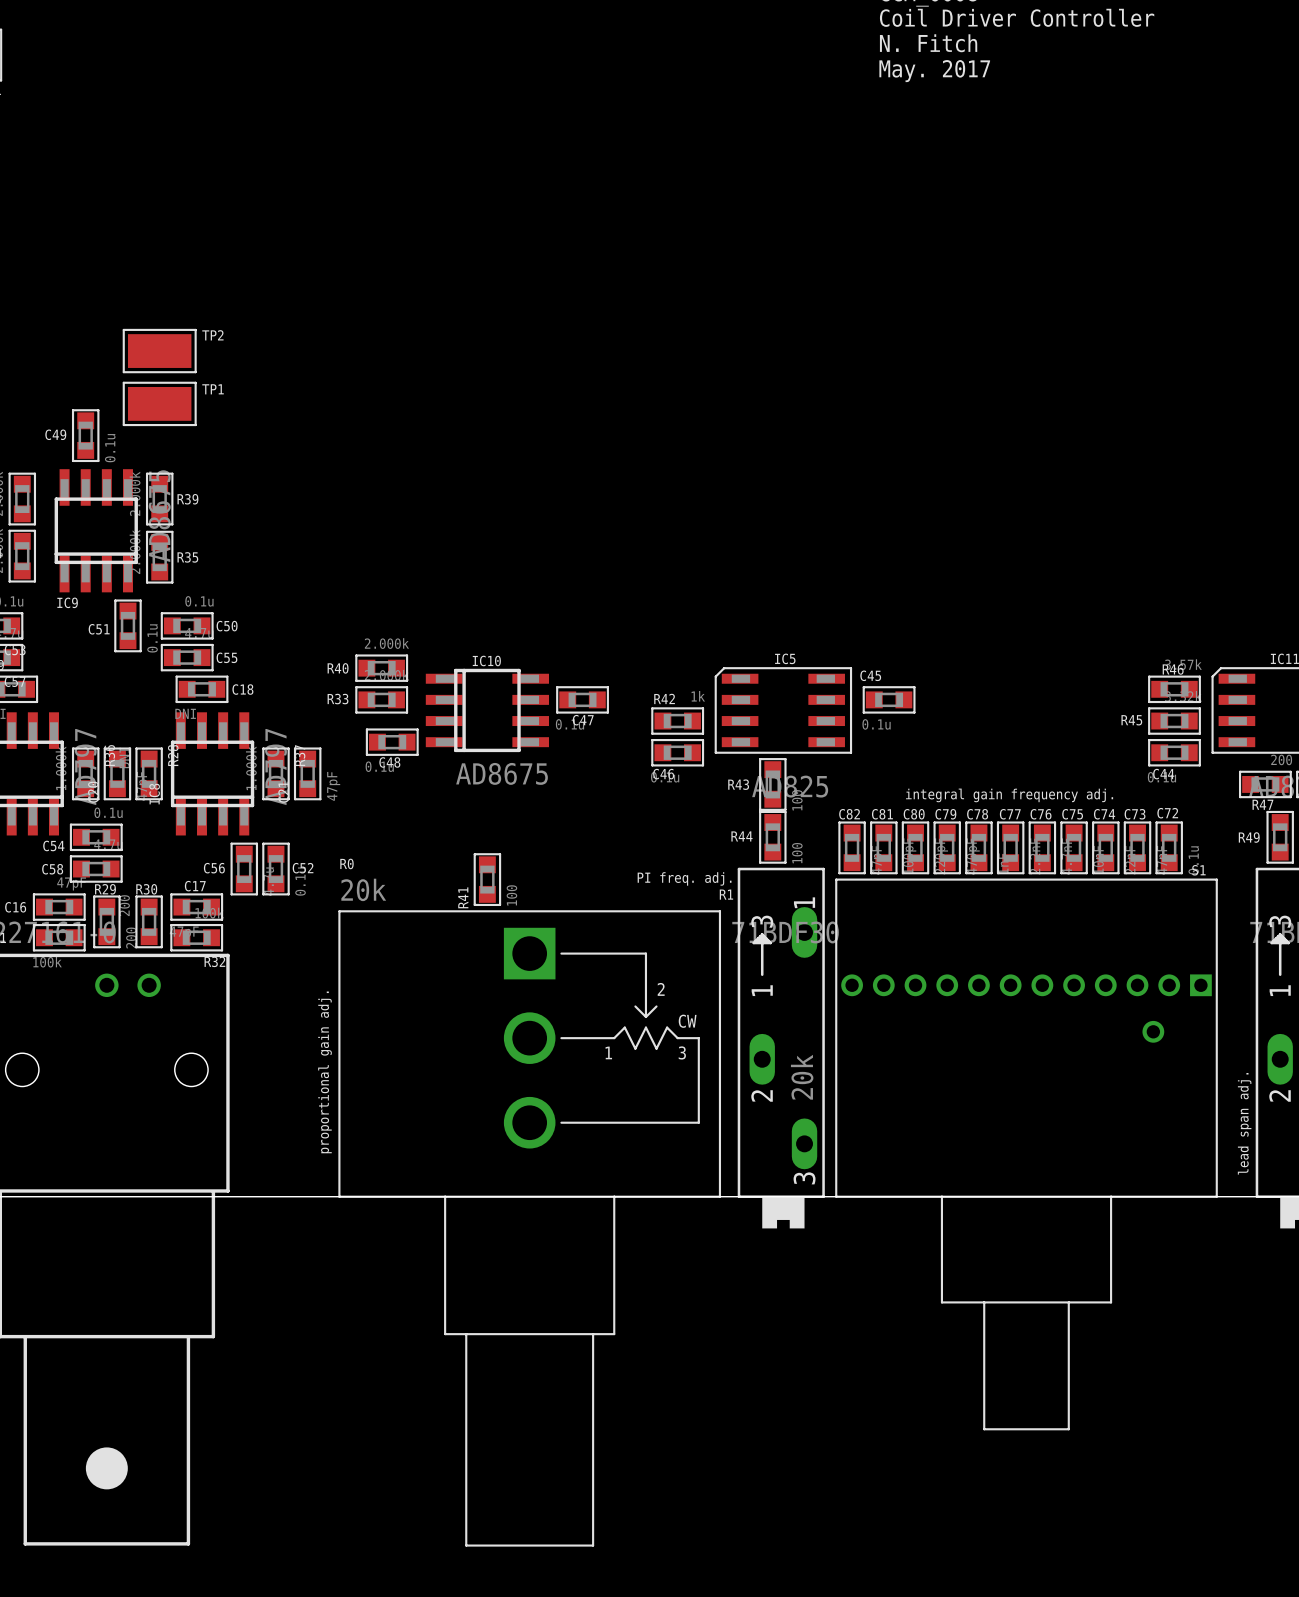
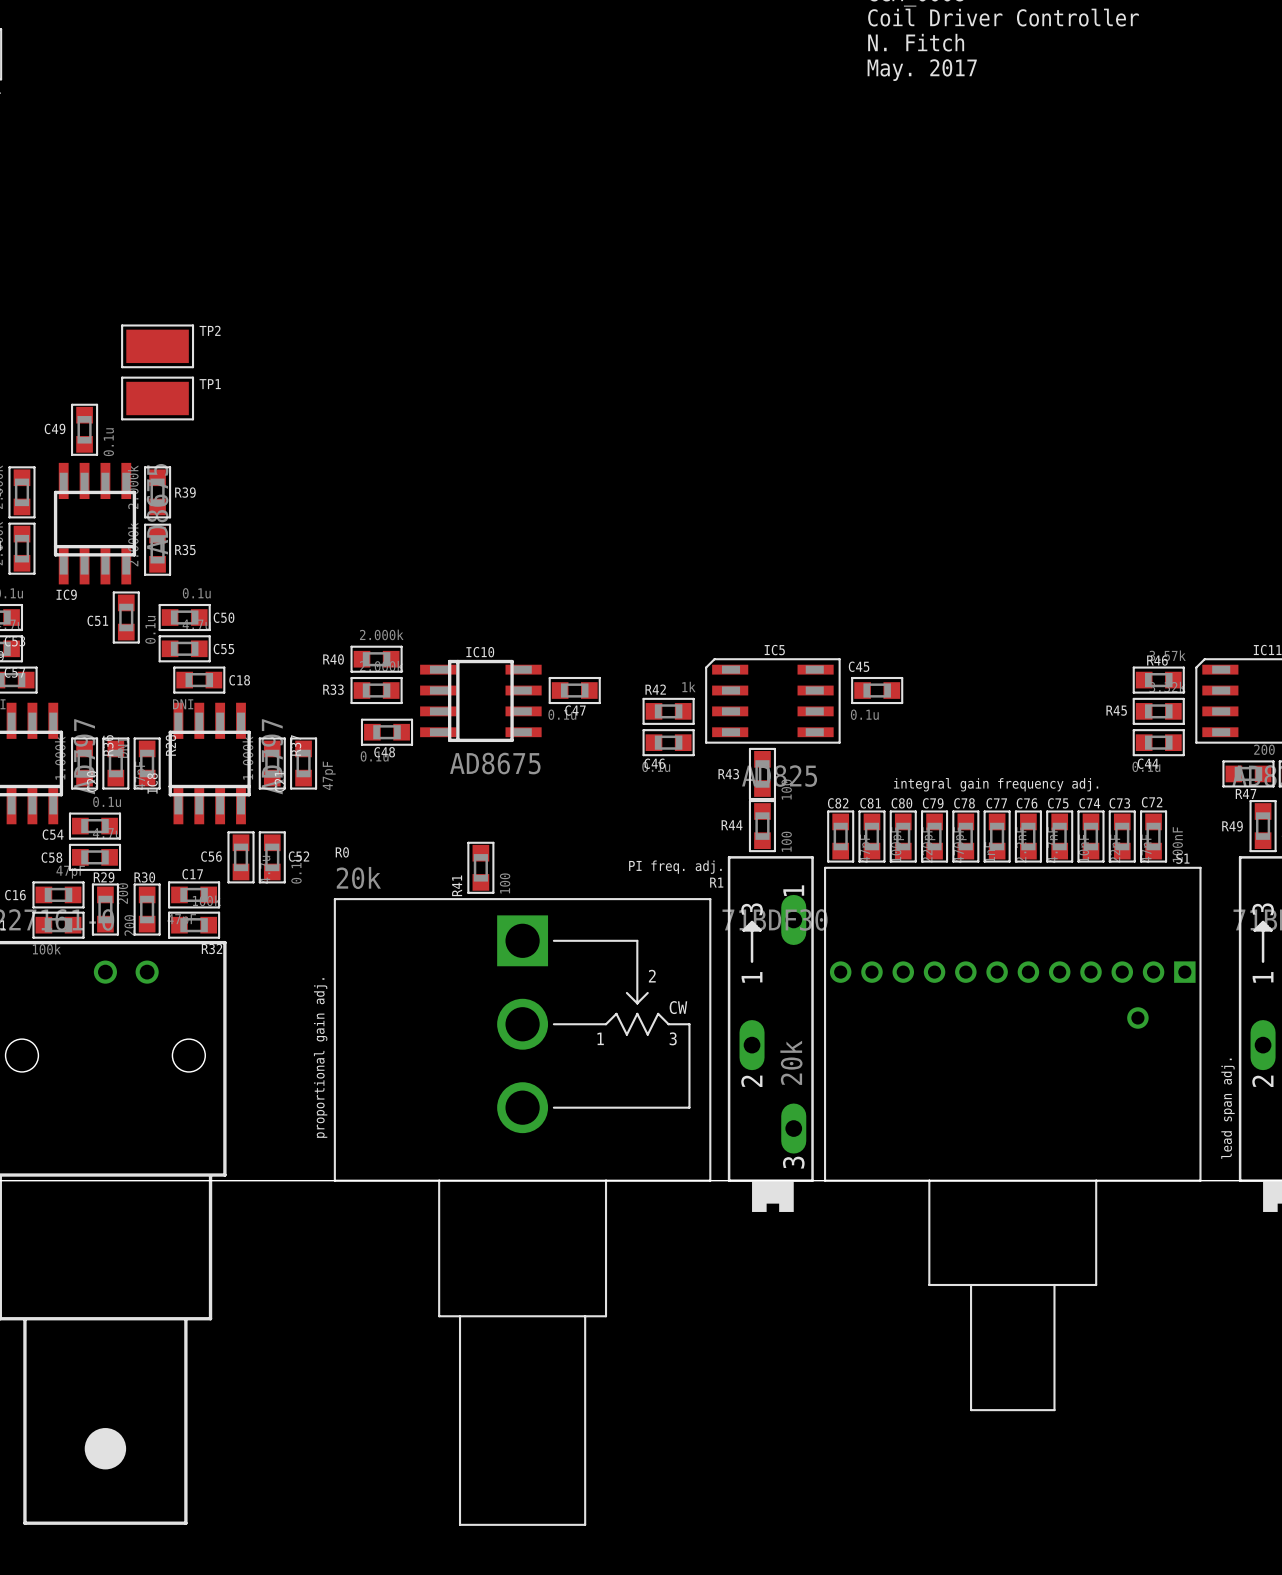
C72 value: 0.1u (1193, 860) -> 100nF (1177, 844)

